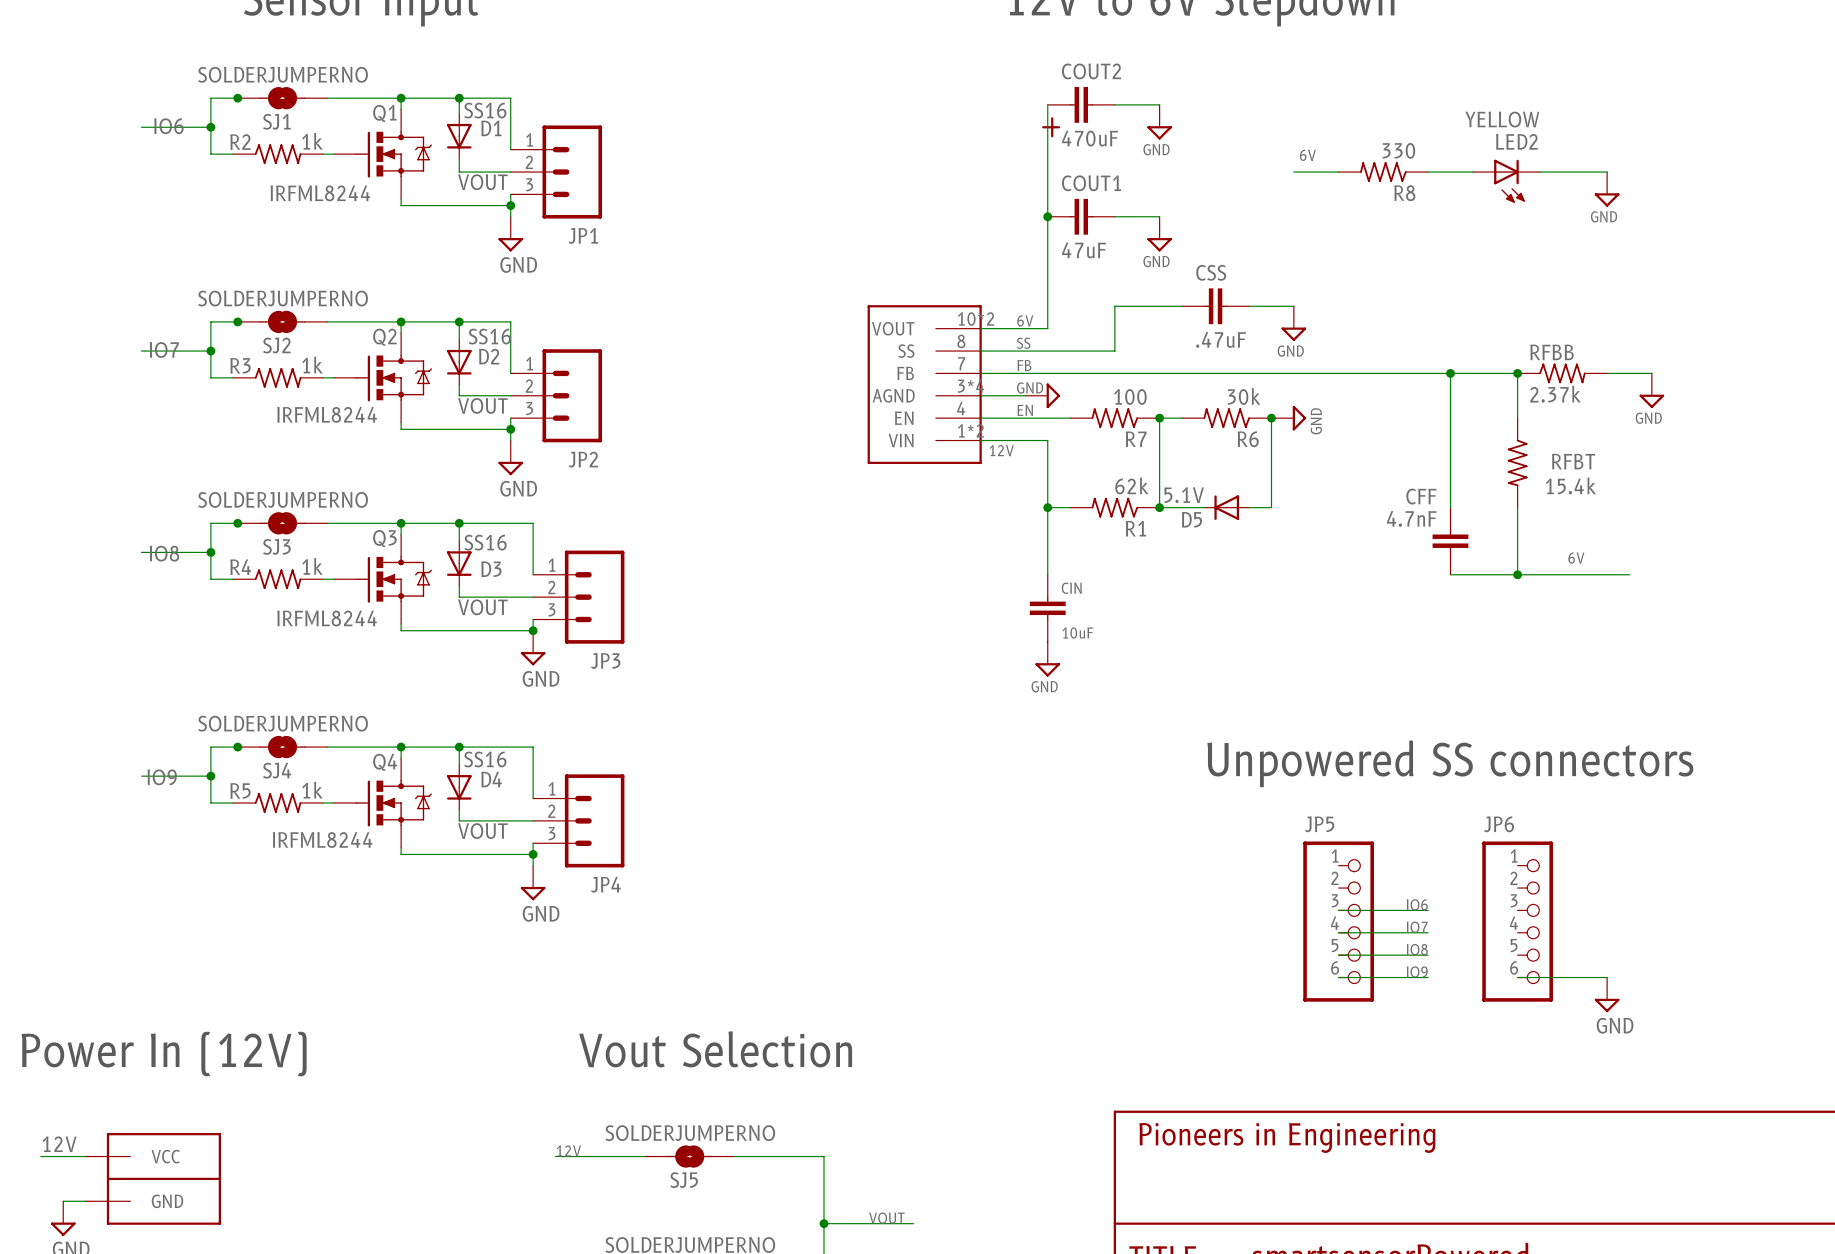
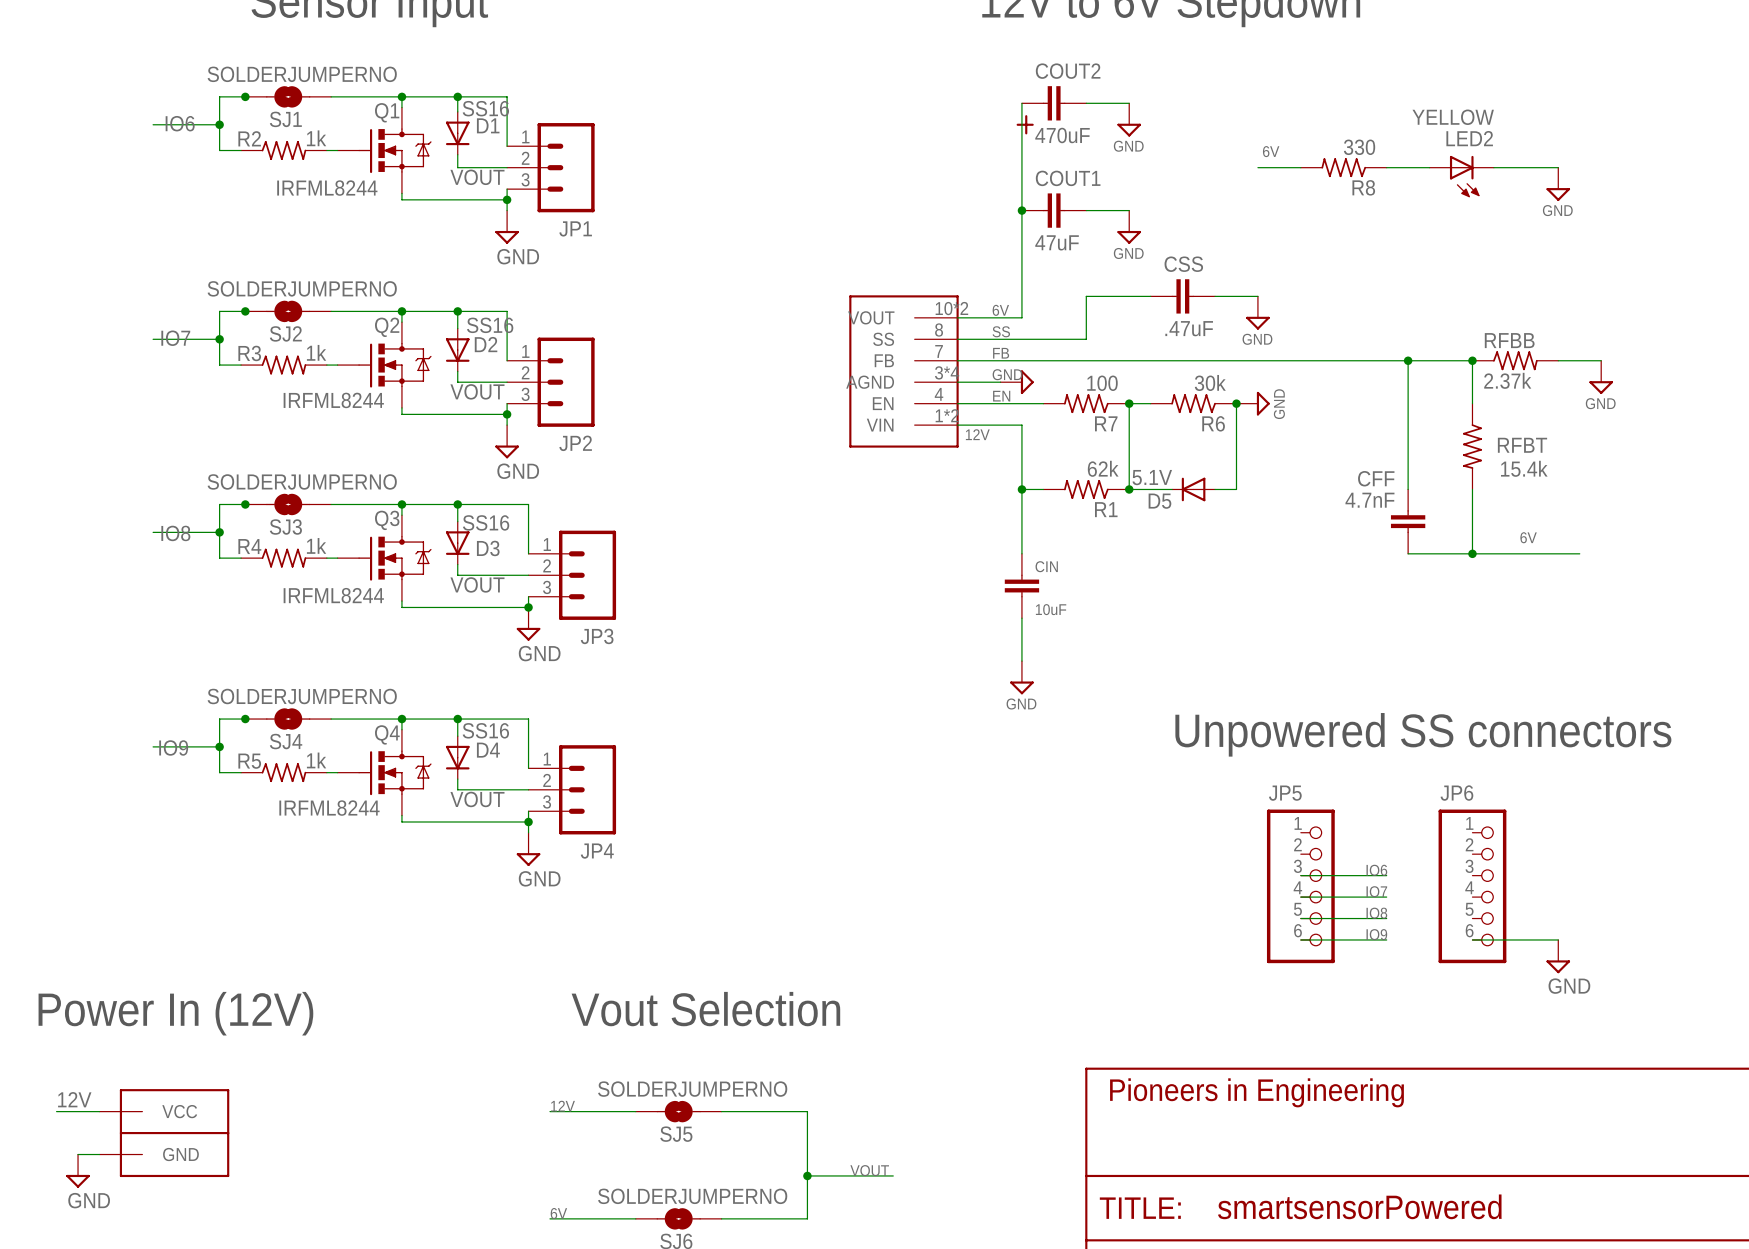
power symbol position: GND (1047, 659) -> GND (1021, 677)

